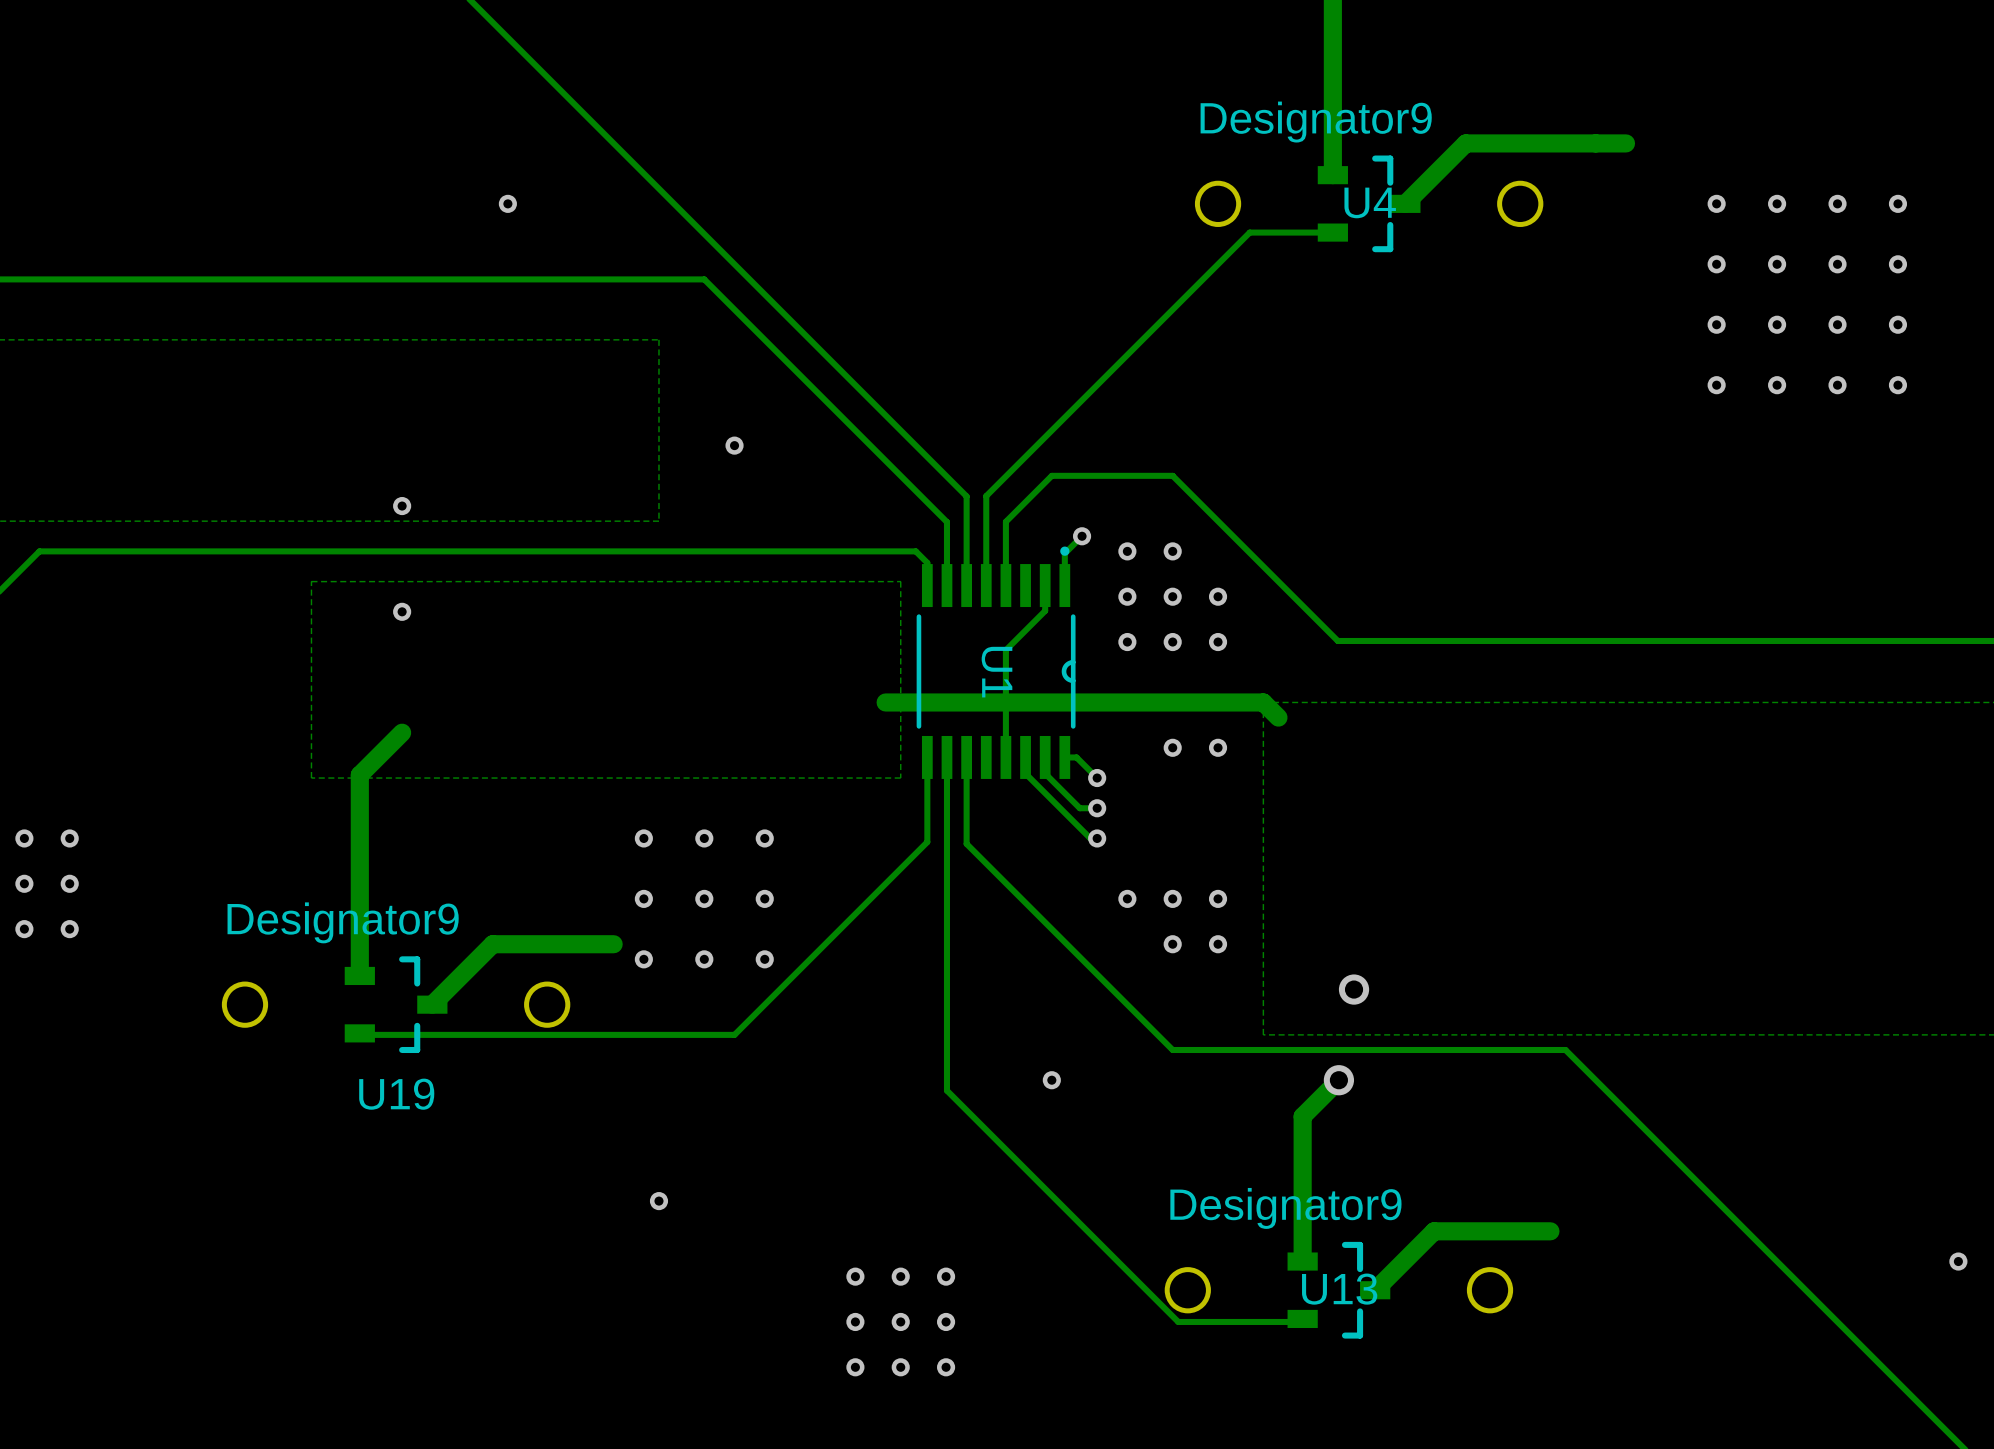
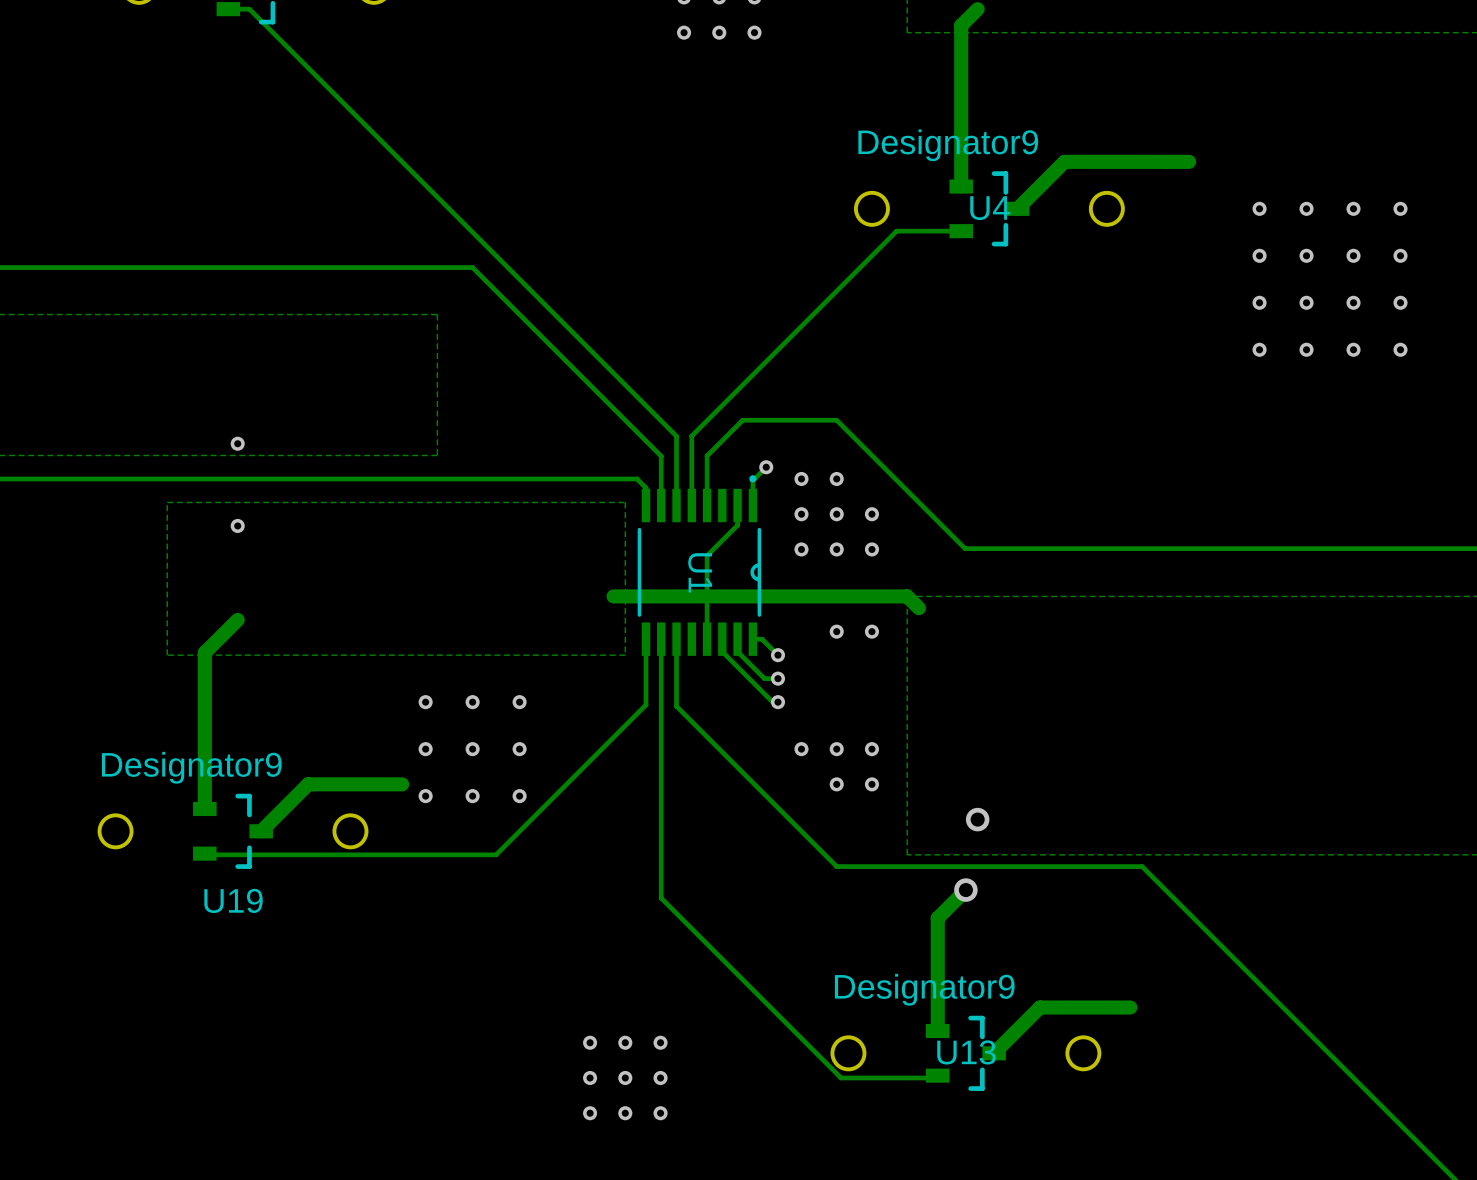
via: (507, 203) -> none
via: (734, 445) -> none
via: (1051, 1080) -> none
via: (658, 1201) -> none
via: (1958, 1261) -> none

